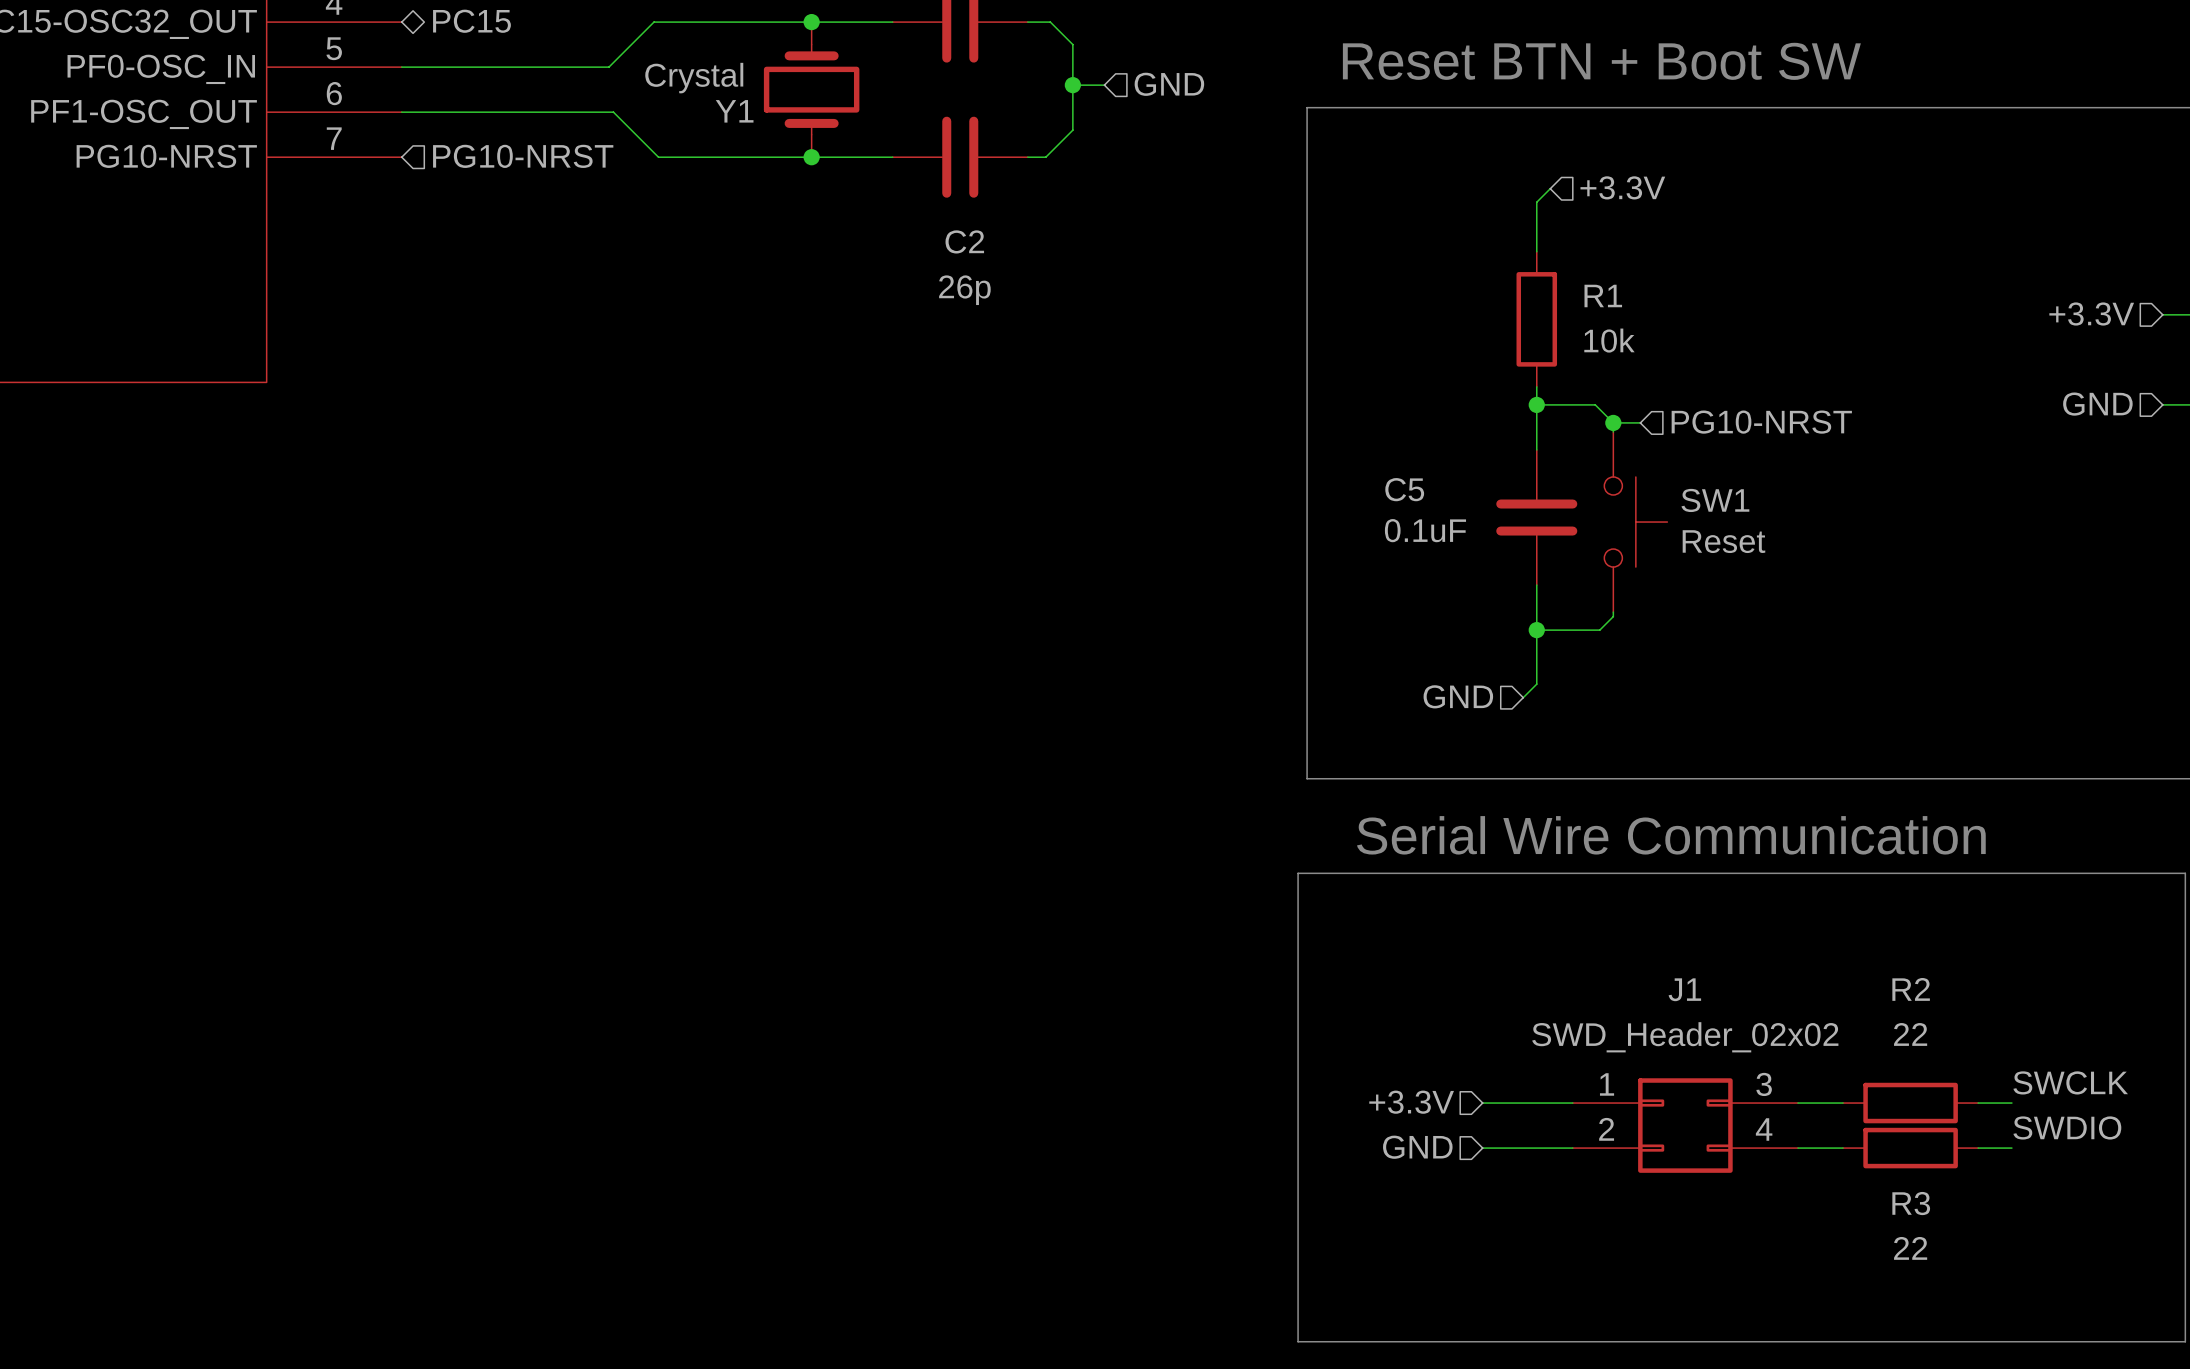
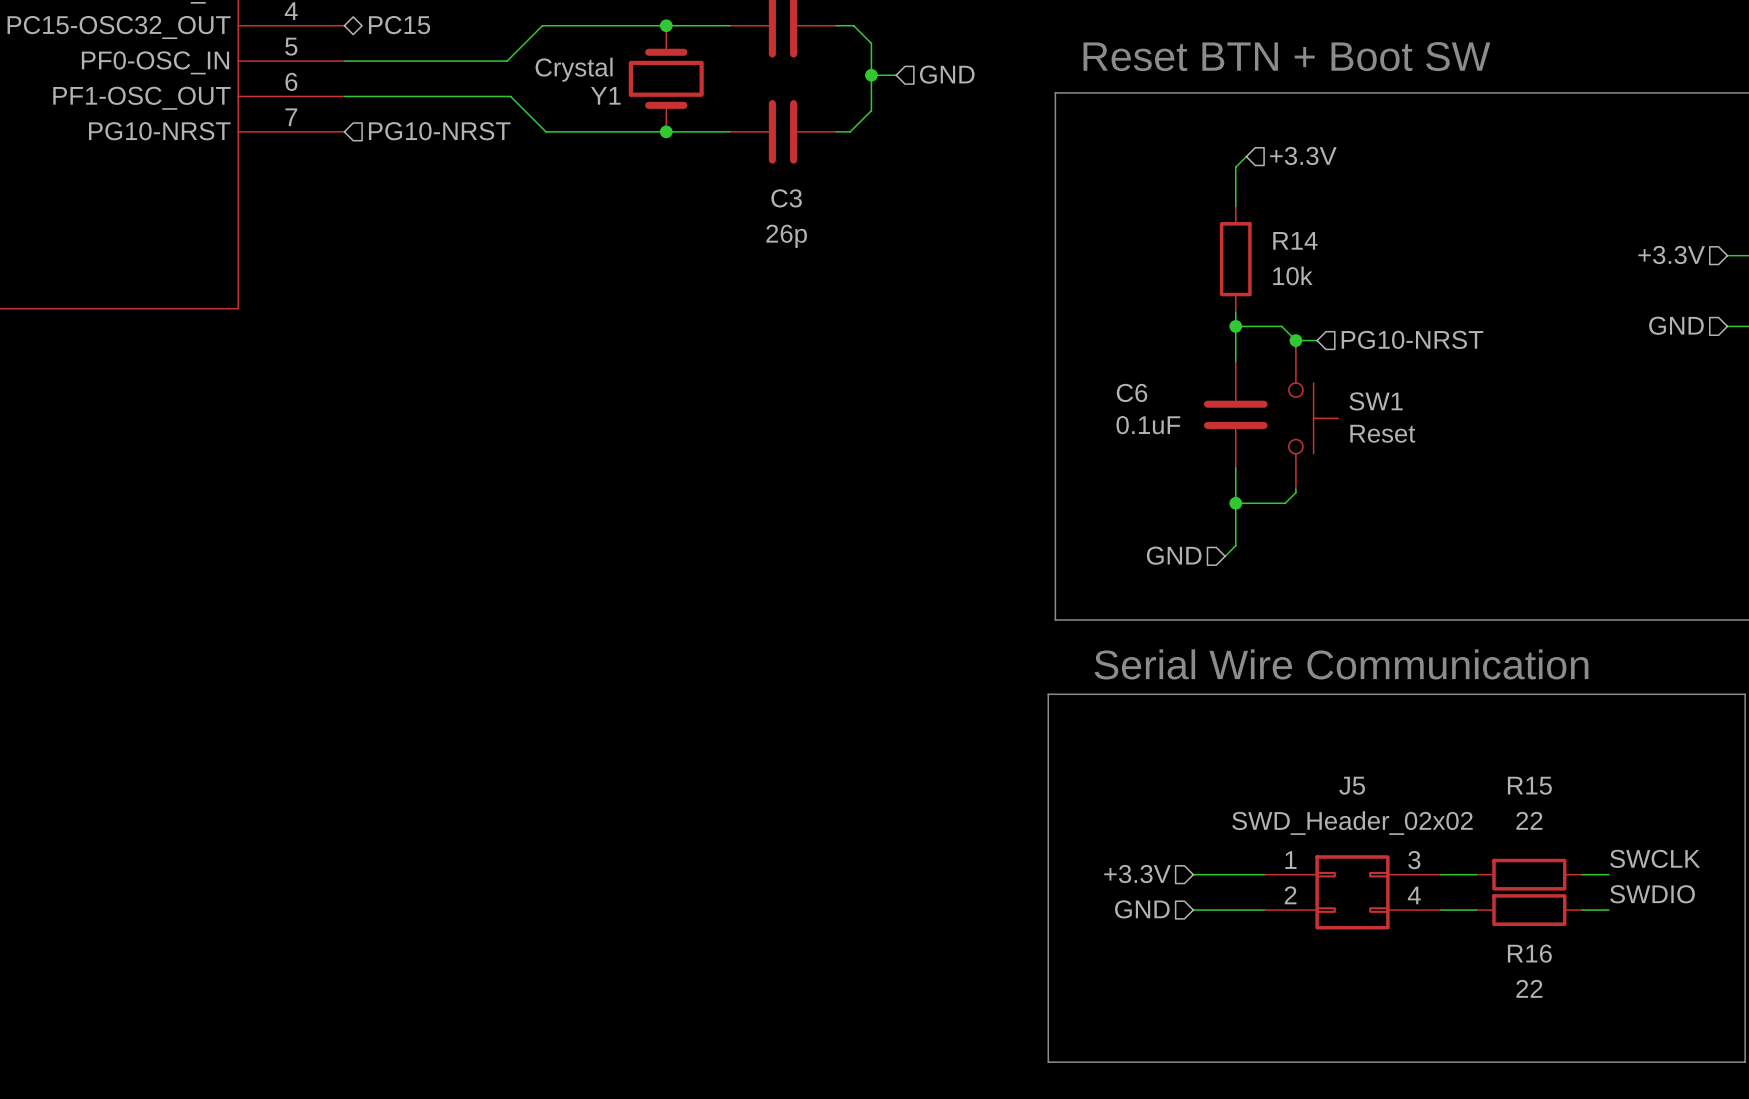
C2 name: C2 (964, 241) -> C3 (786, 198)
R1 name: R1 (1603, 295) -> R14 (1295, 240)
C5 name: C5 (1404, 489) -> C6 (1132, 392)
J1 name: J1 (1684, 989) -> J5 (1352, 785)
R2 name: R2 (1911, 989) -> R15 (1529, 785)
R3 name: R3 (1911, 1203) -> R16 (1529, 953)

